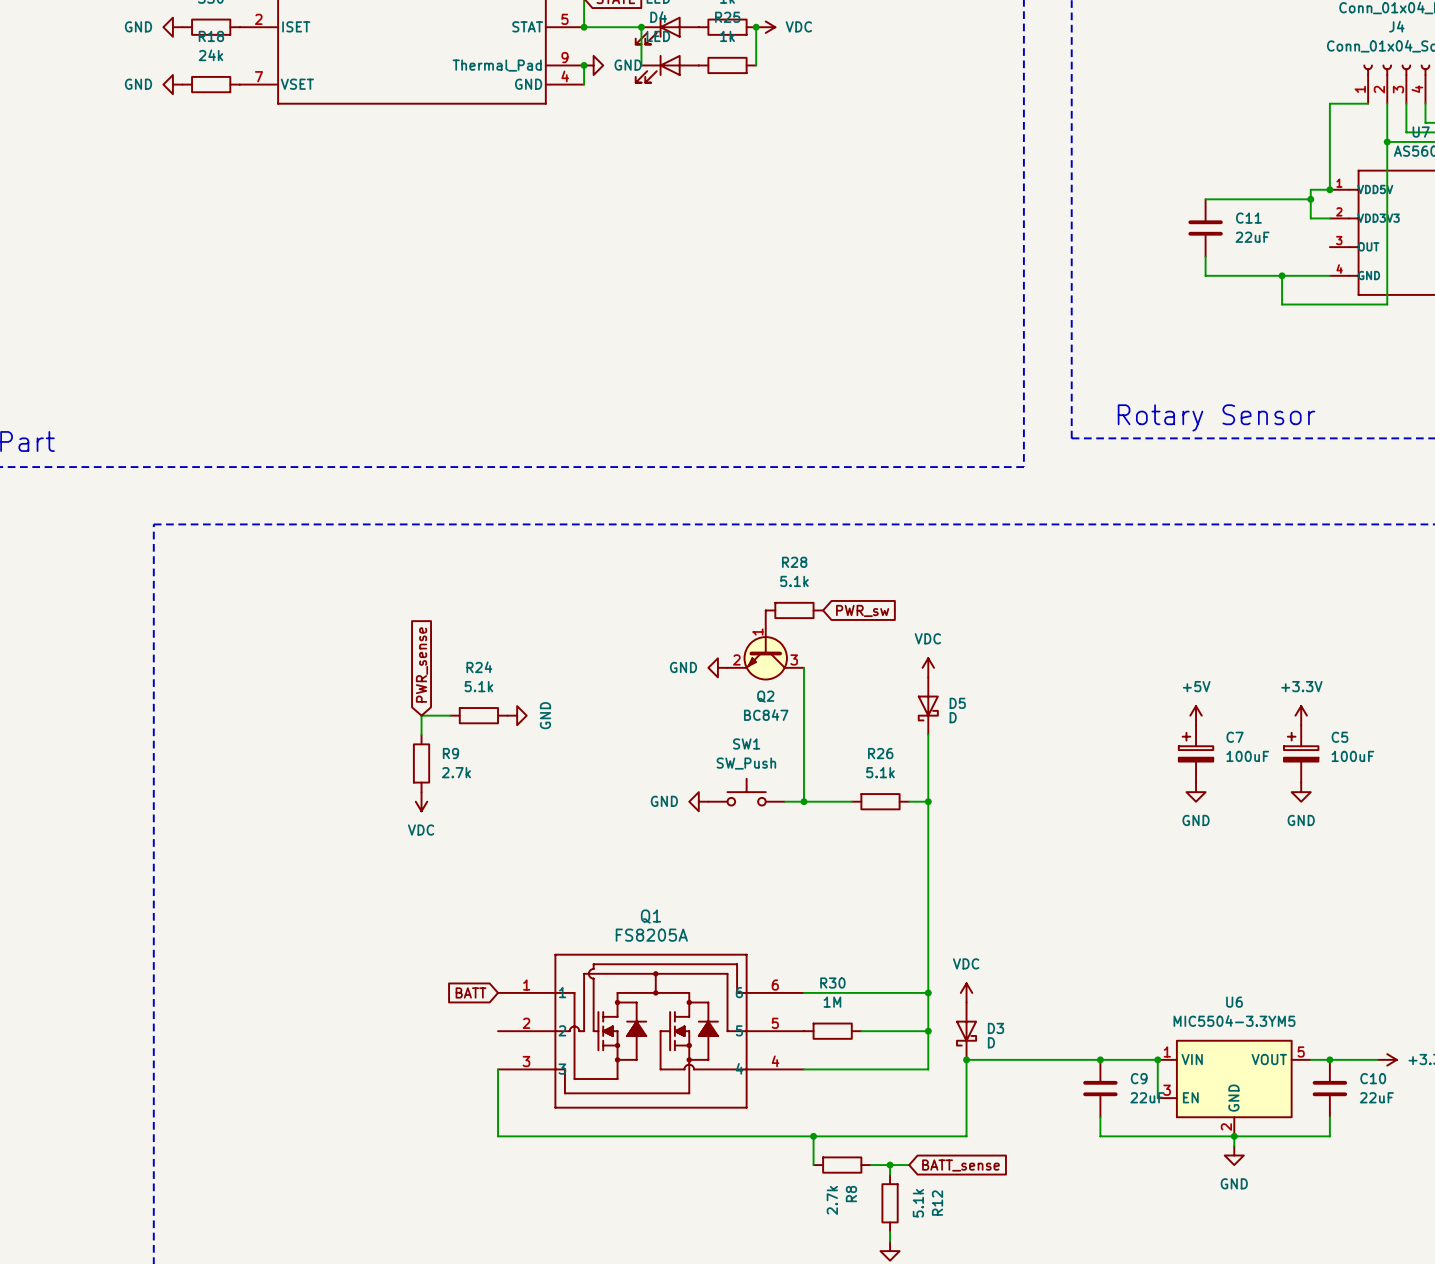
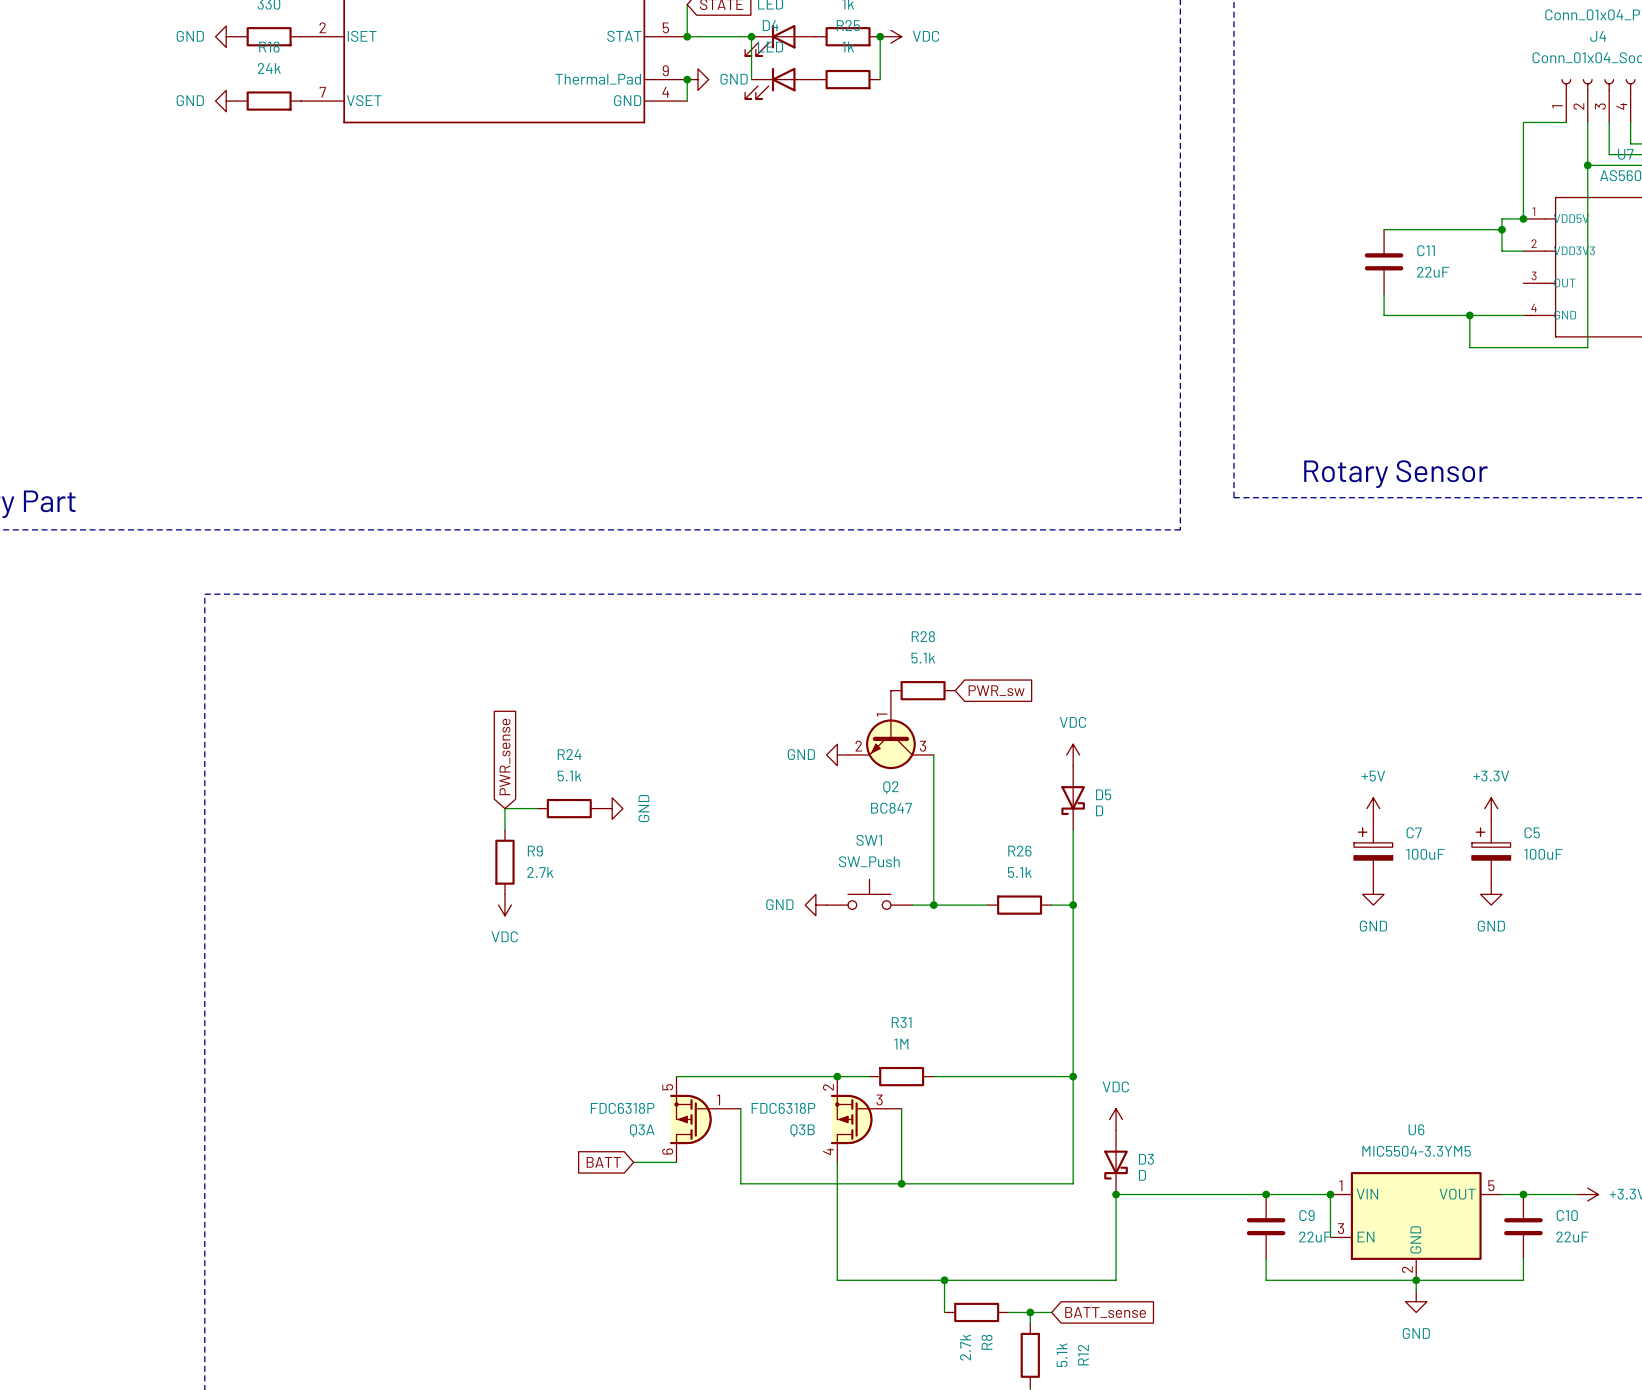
junction: none -> (837, 1076)
R31: none -> 1M (901, 1076)
junction: none -> (1073, 1076)
wire: none -> (901, 1108) (901, 1183)
global label position: BATT (471, 992) -> BATT (603, 1162)
Q3A: none -> FDC6318P (705, 1119)
Q3B: none -> FDC6318P (866, 1119)
wire: (803, 992) (928, 992) -> (933, 1076) (1073, 1076)
junction: (928, 992) -> none
Q1: FS8205A (651, 1031) -> none
R30: 1M (832, 1031) -> none
wire: (861, 1031) (928, 1031) -> none
junction: (928, 1031) -> none
junction: none -> (901, 1183)
wire: (928, 1050) (928, 1069) (803, 1069) -> (1073, 1183) (740, 1183) (740, 1108)
wire: (498, 1069) (498, 1136) (717, 1136) -> (837, 1162) (837, 1280)

